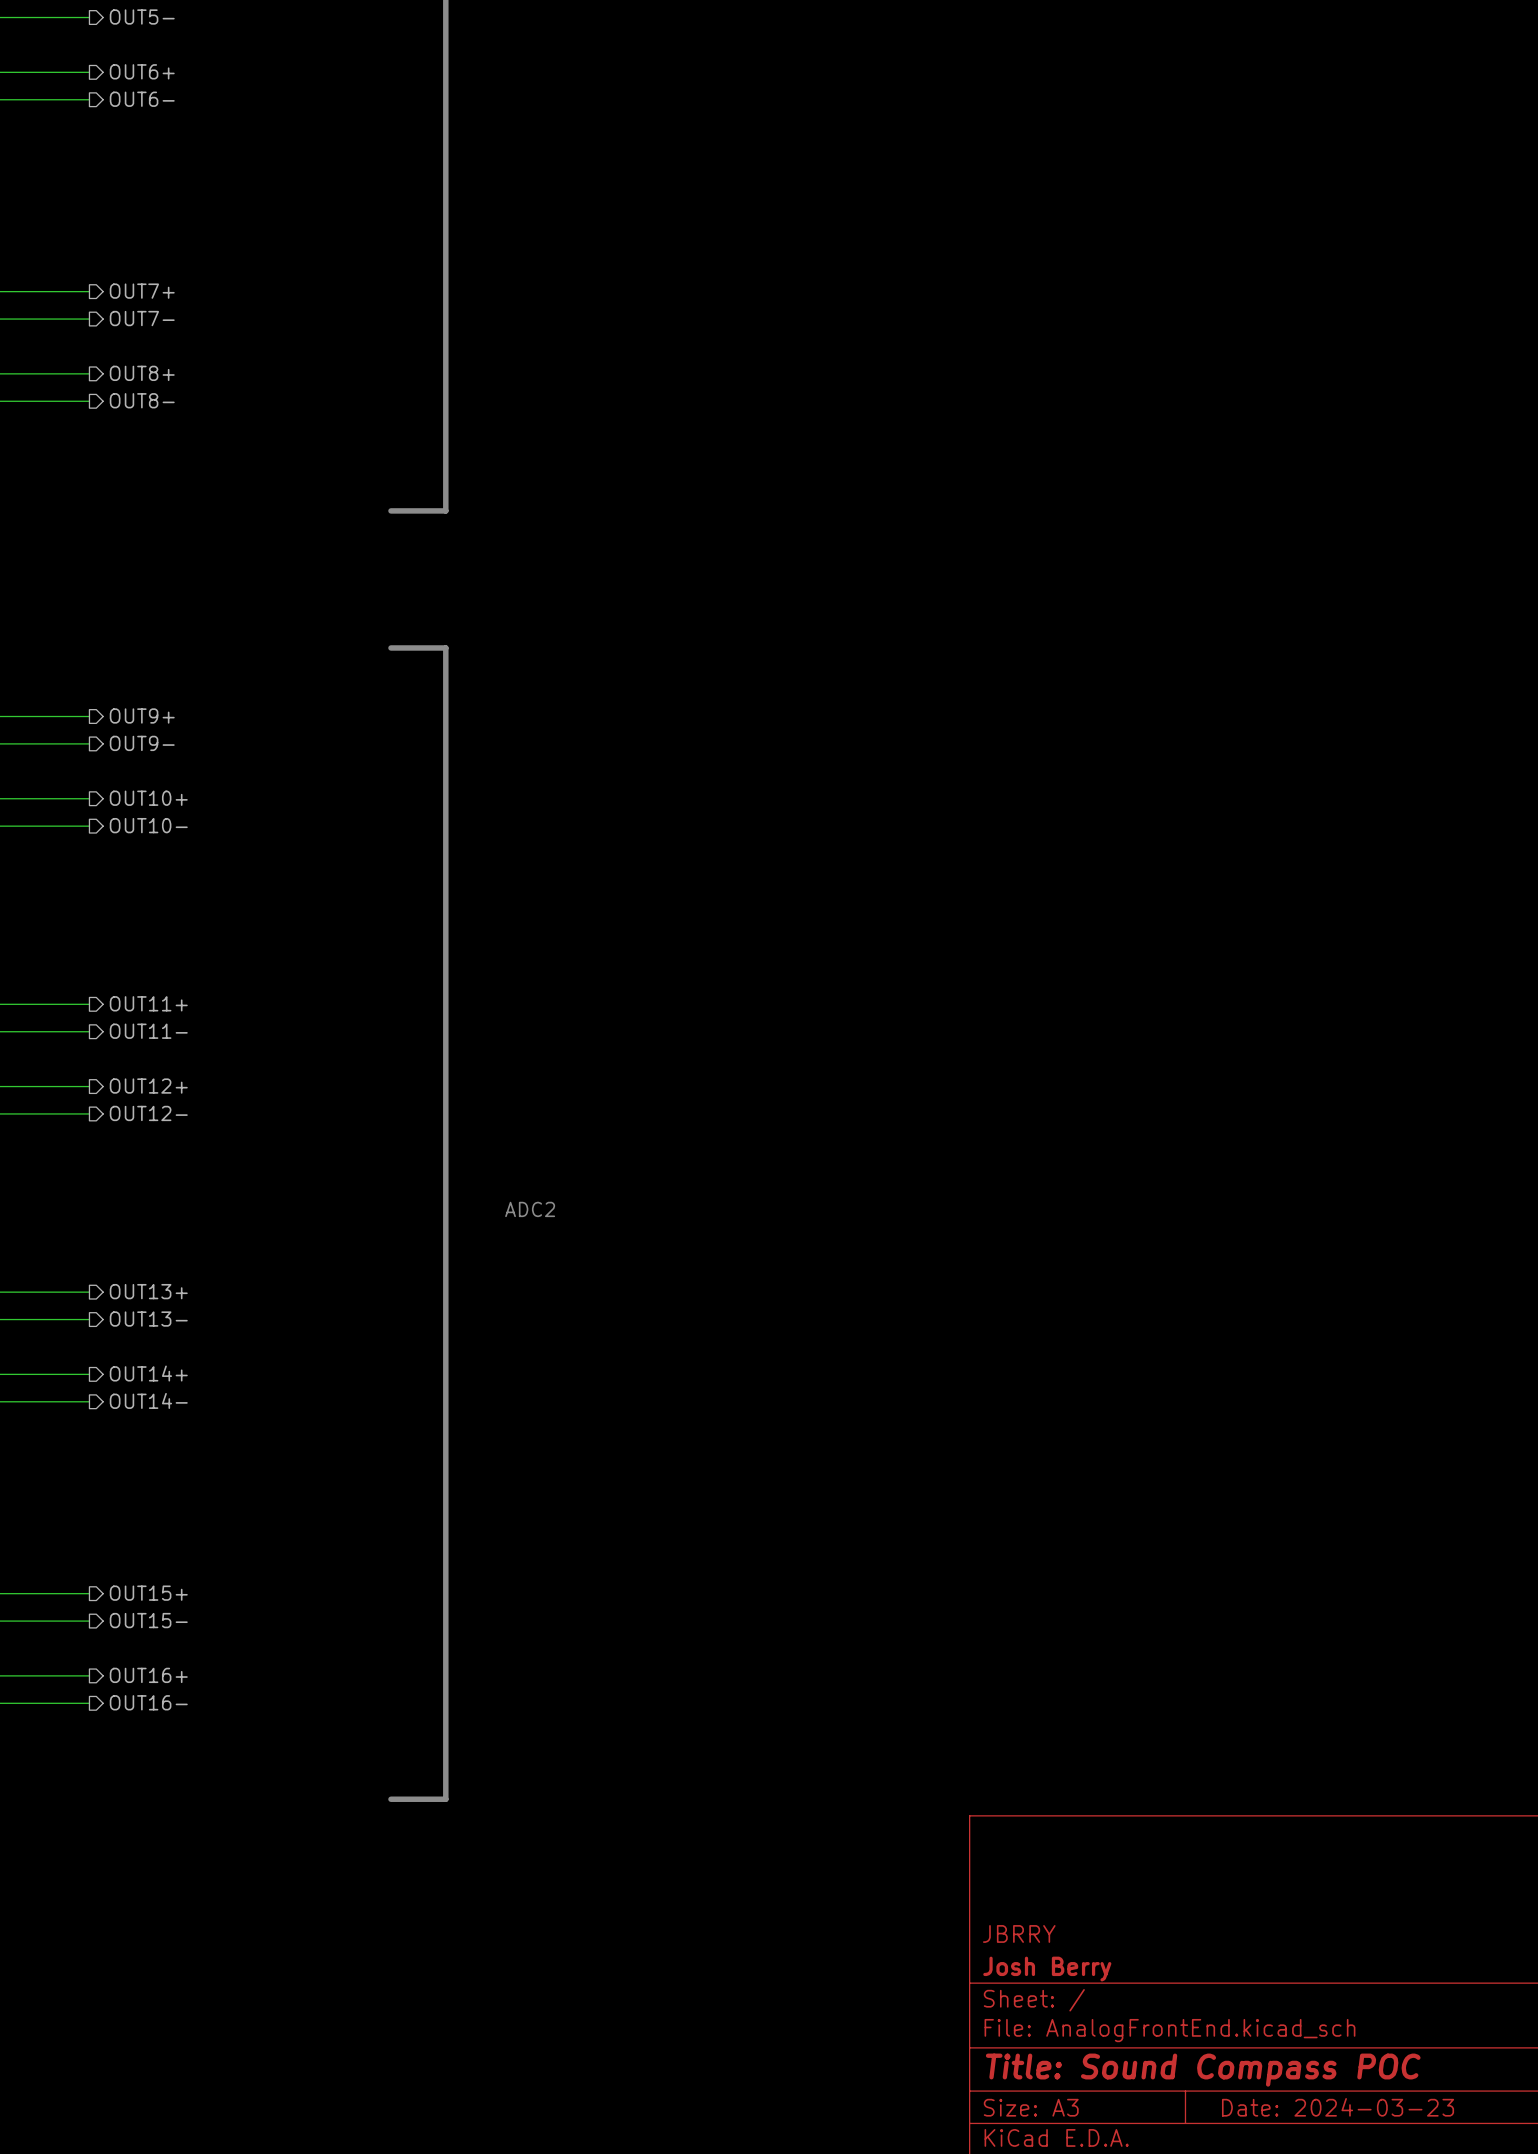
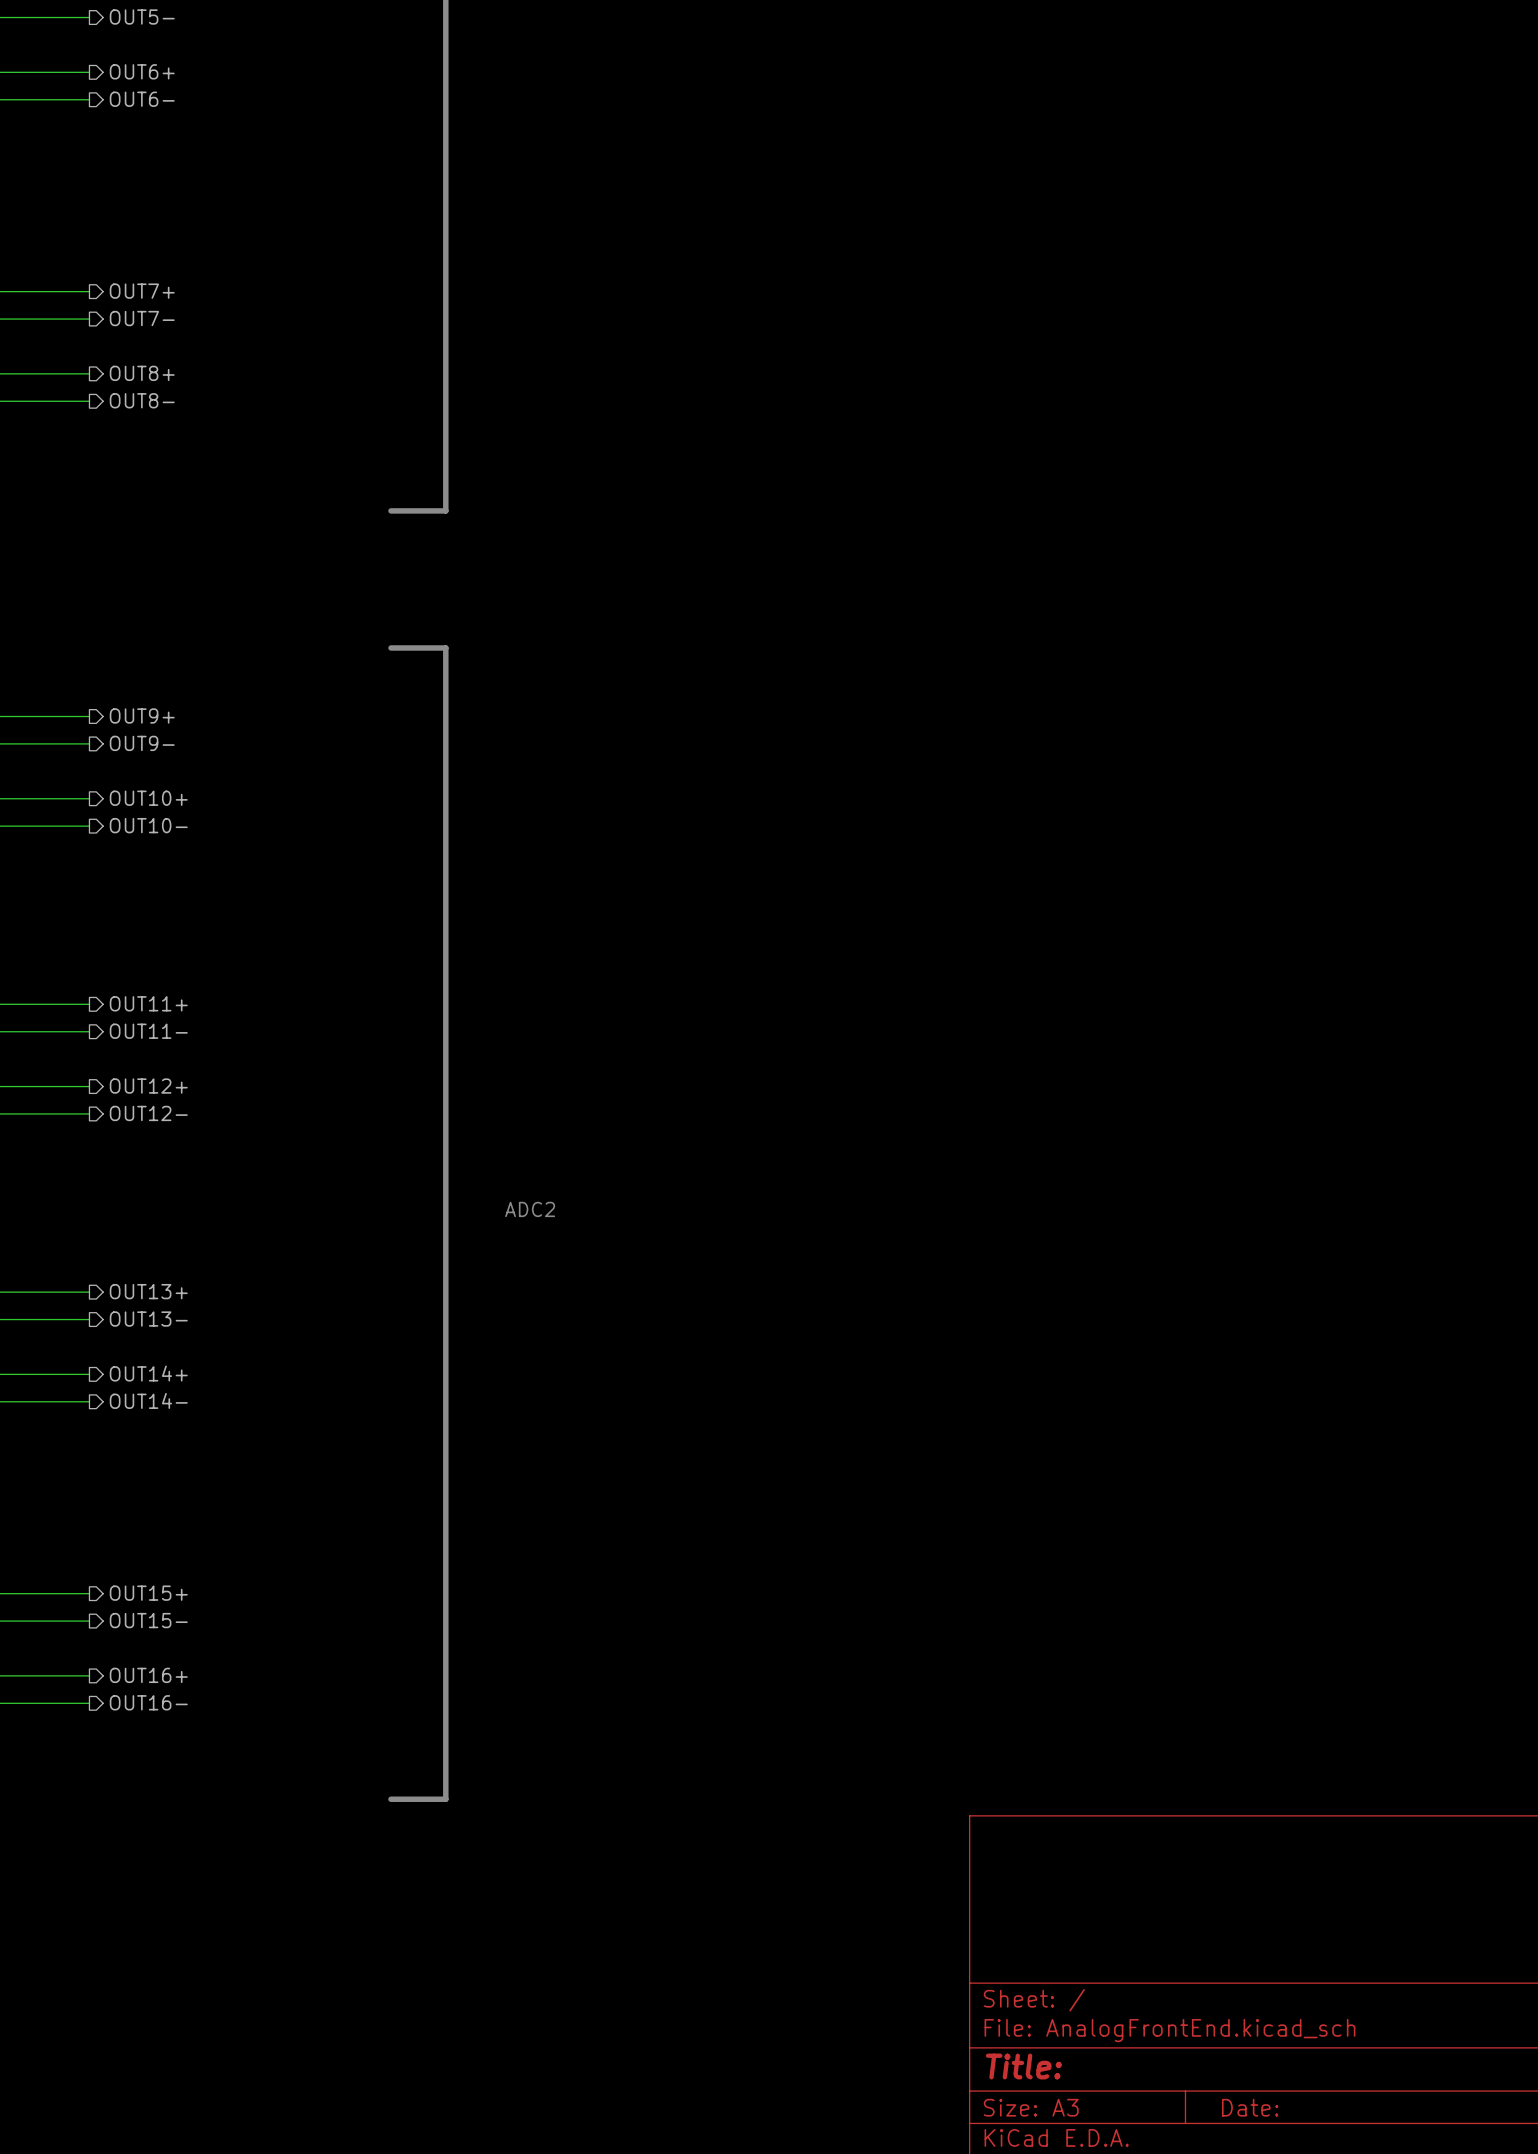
title block: JBRRY (1019, 1933) -> none
title block: Josh Berry (1047, 1969) -> none
title block: Title: Sound Compass POC (1203, 2070) -> Title: (1023, 2066)
title block: Date: 2024-03-23 (1338, 2107) -> Date: (1250, 2107)

